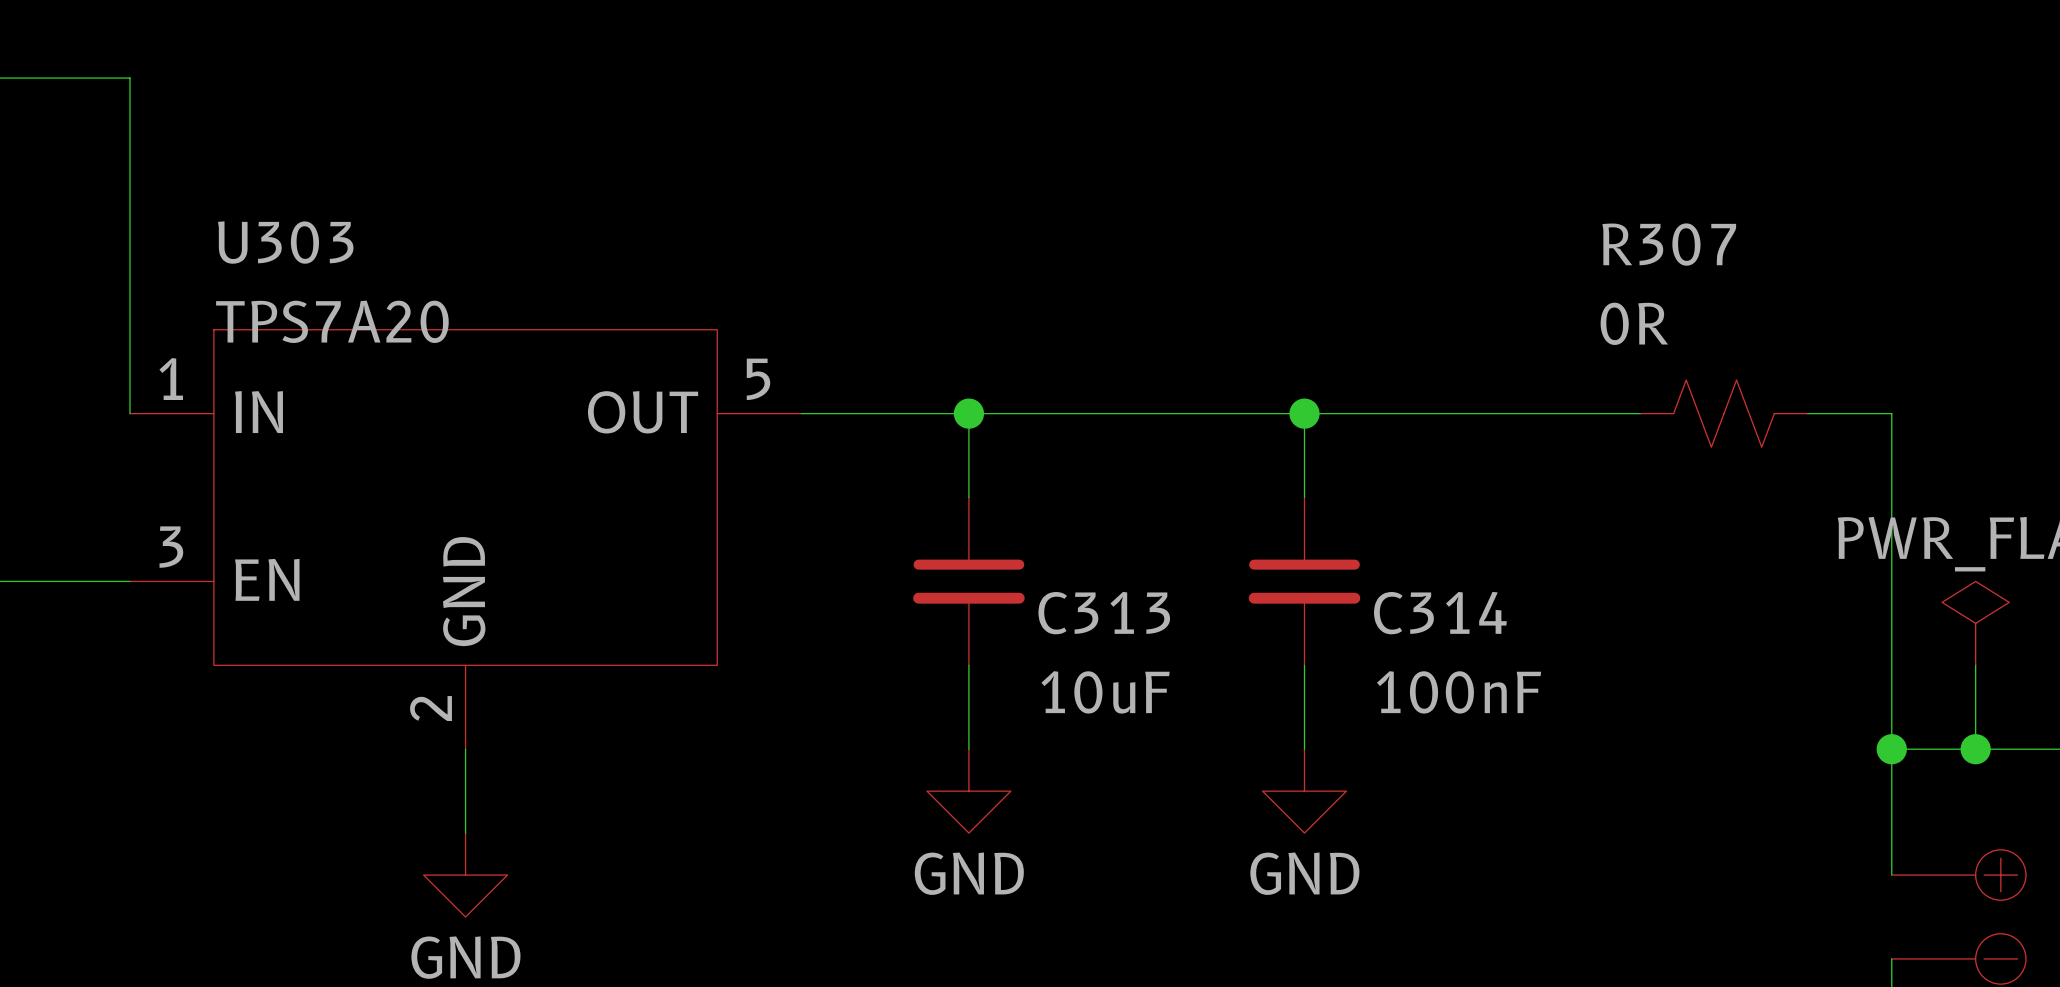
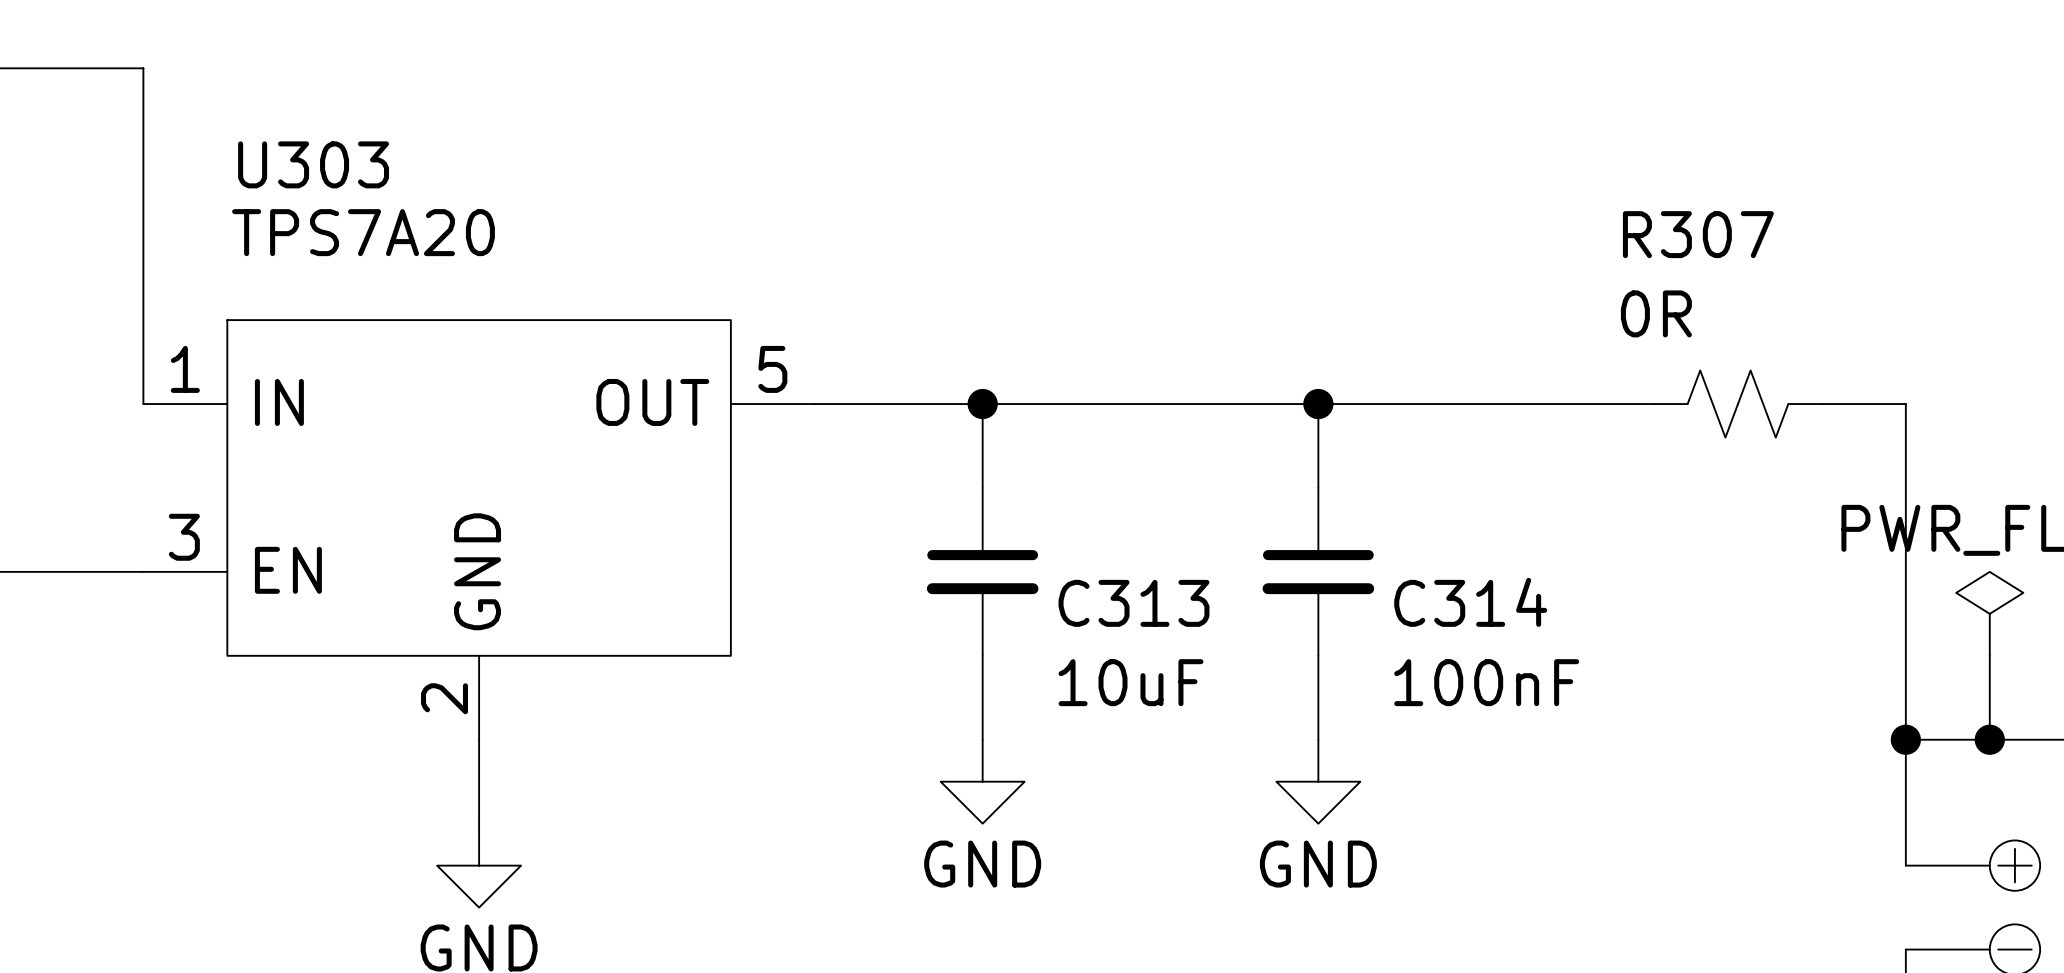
U303 name position: U303 (285, 242) -> U303 (313, 164)
U303 value position: TPS7A20 (332, 321) -> TPS7A20 (363, 232)

